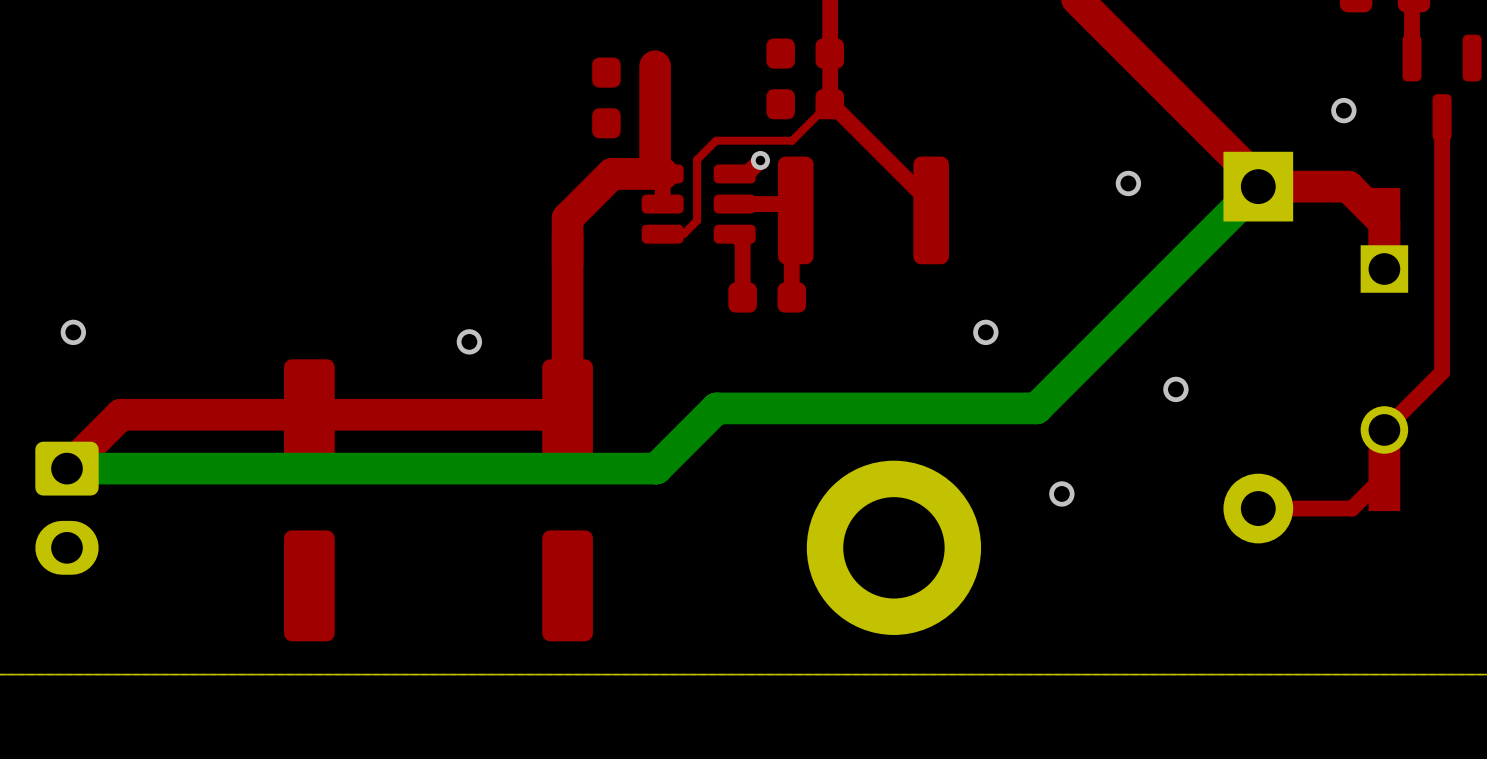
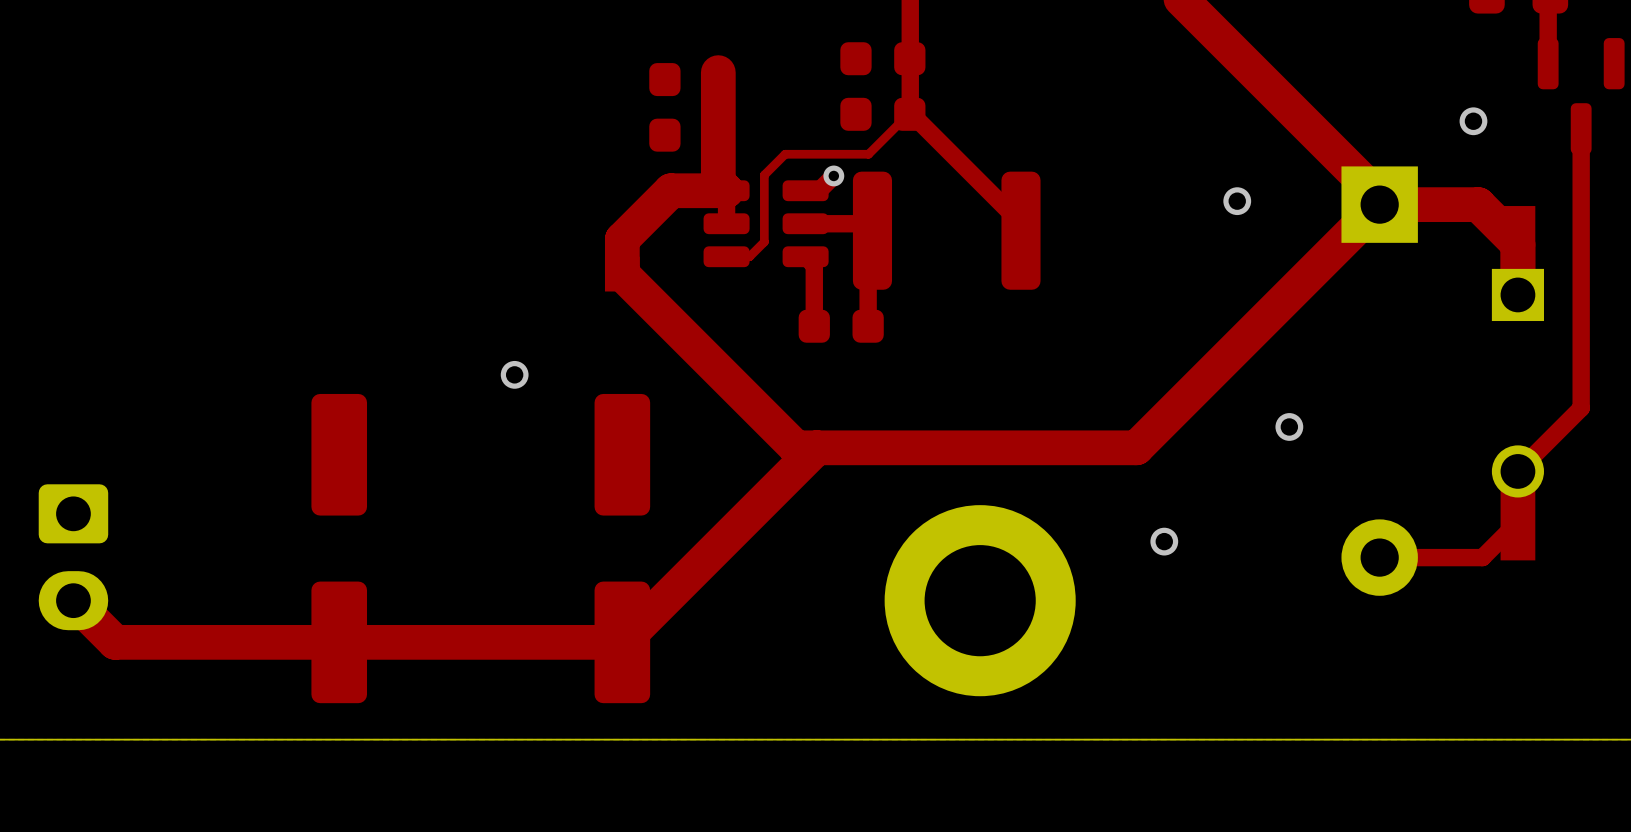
bottom track: (1258, 186) (1036, 408) (716, 408) (656, 468) (66, 468) -> none
top track: (567, 250) (567, 414) (120, 414) (66, 468) -> (622, 274) (796, 447) (1136, 447) (1379, 204)
via: (73, 332) -> none
via: (985, 332) -> none
top track: none -> (816, 447) (622, 642) (115, 642) (73, 600)

